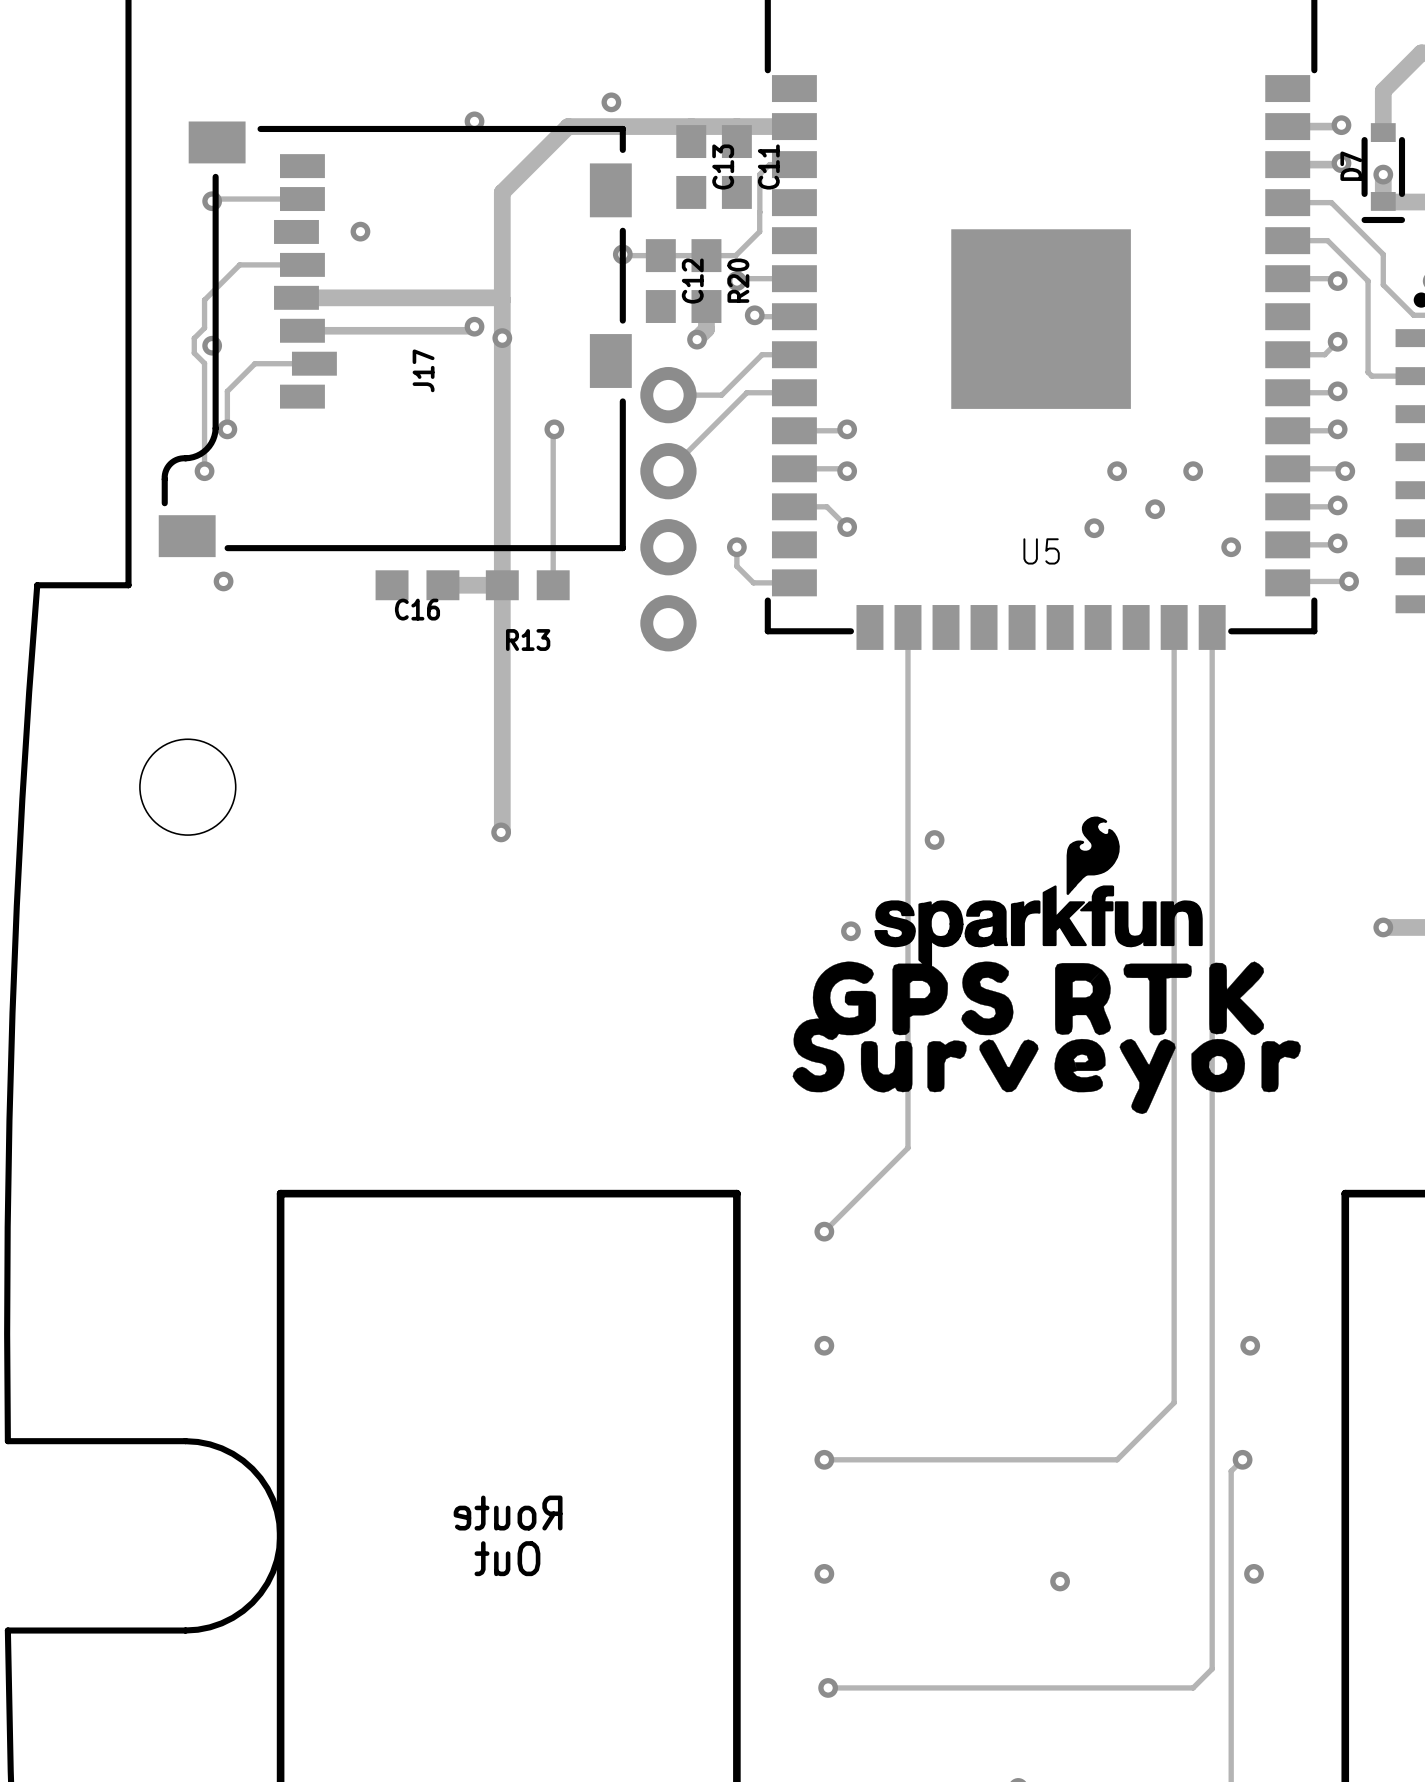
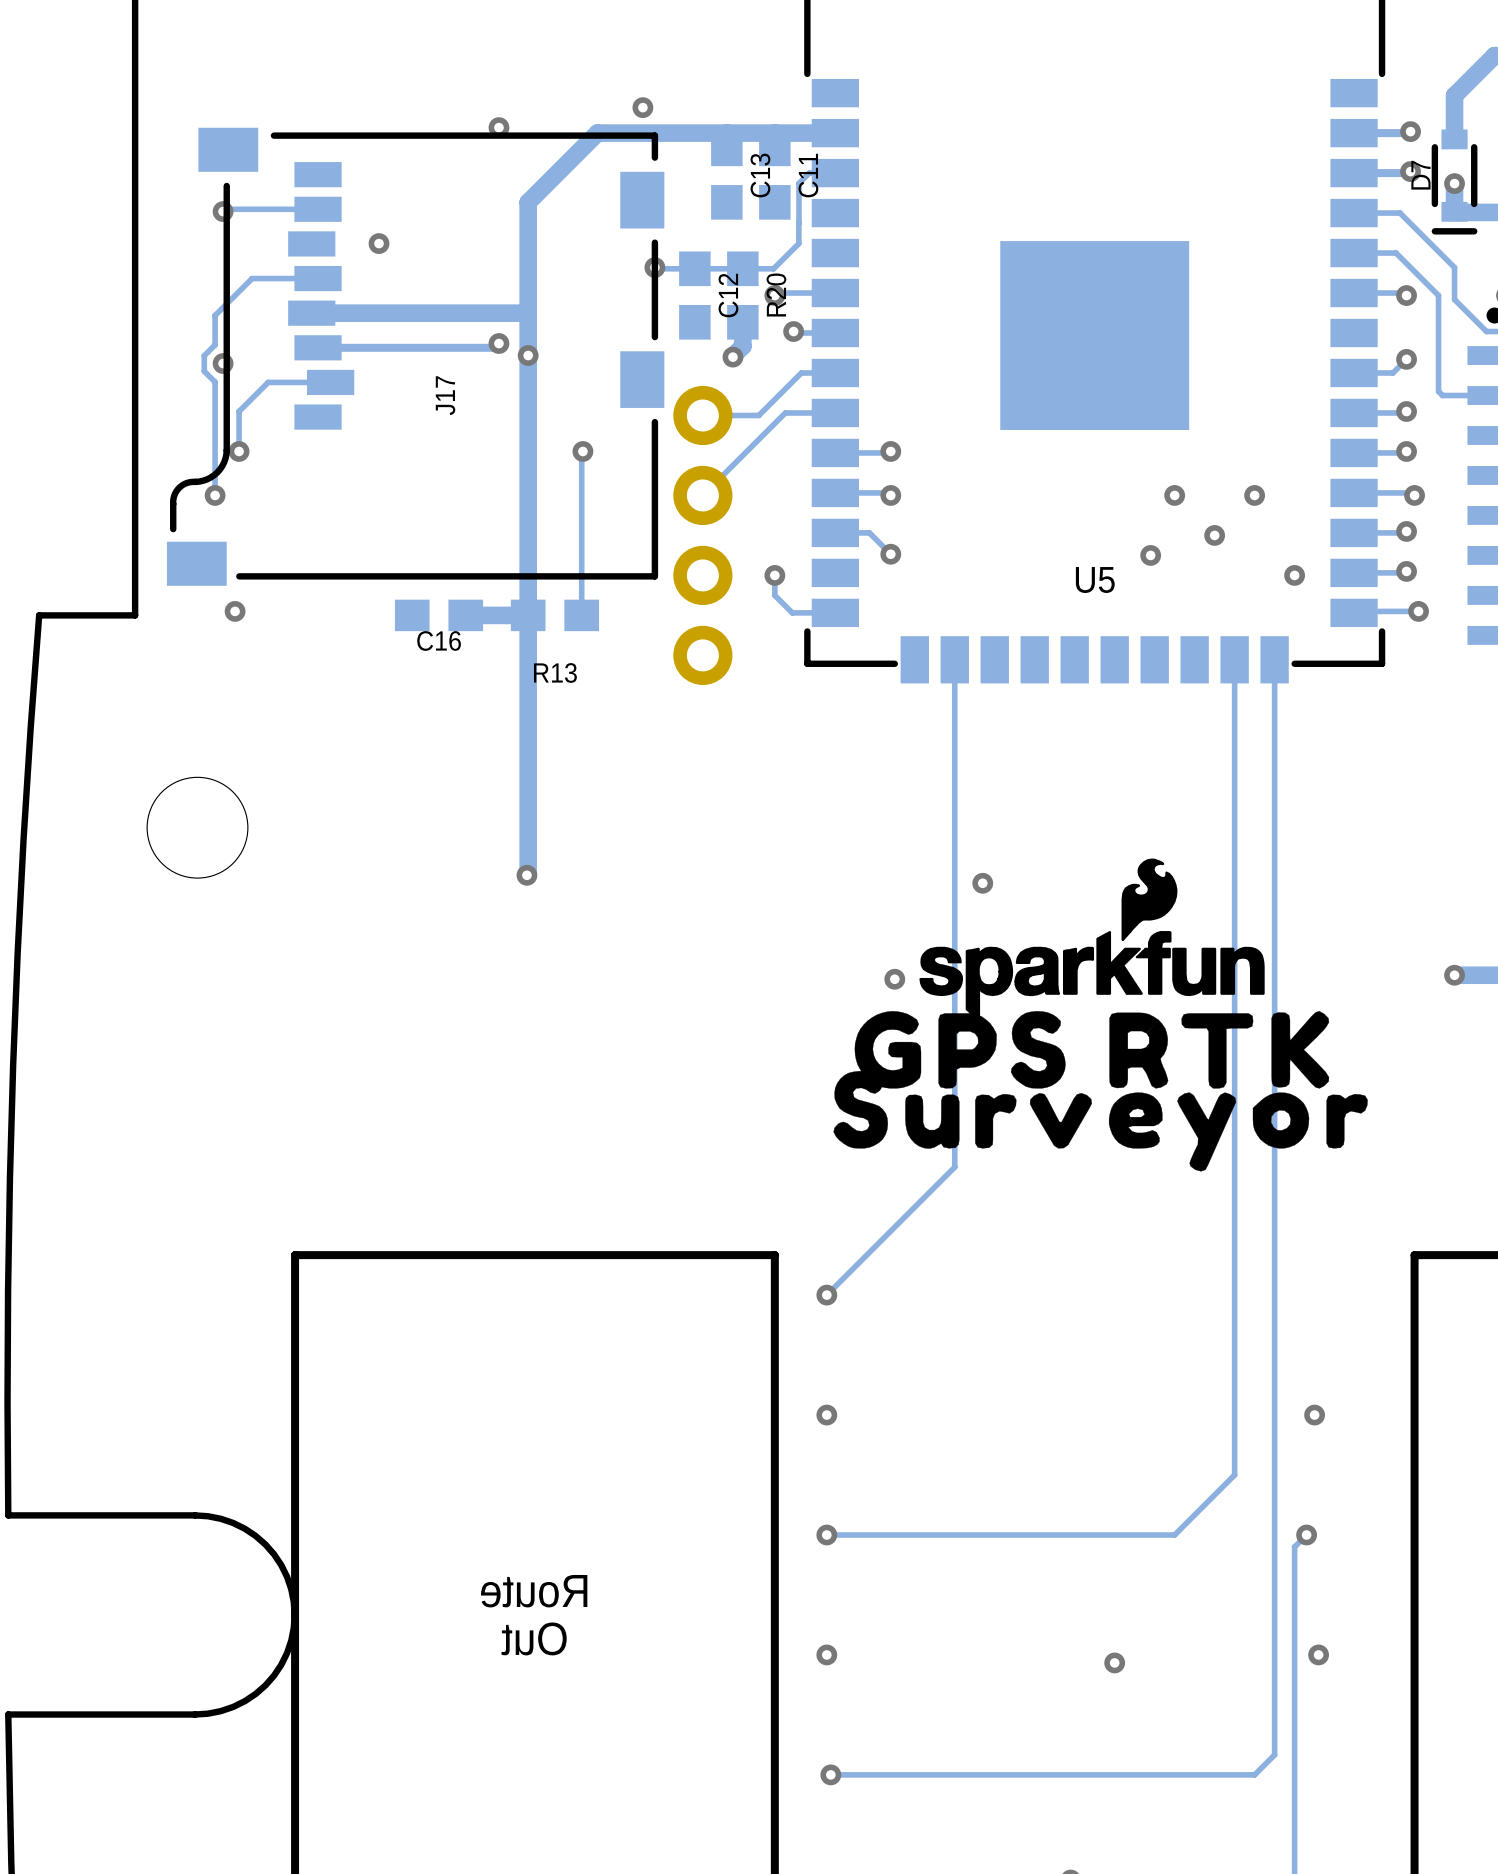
track: (907, 1109) (907, 1148) (824, 1231) -> (954, 1167) (826, 1295)
via position: (824, 1231) -> (826, 1295)
via position: (824, 1345) -> (826, 1415)
track: none -> (866, 1534) (826, 1534)
via position: (824, 1459) -> (826, 1534)
via position: (824, 1573) -> (826, 1654)
track: none -> (870, 1774) (830, 1774)
via position: (828, 1687) -> (830, 1774)

